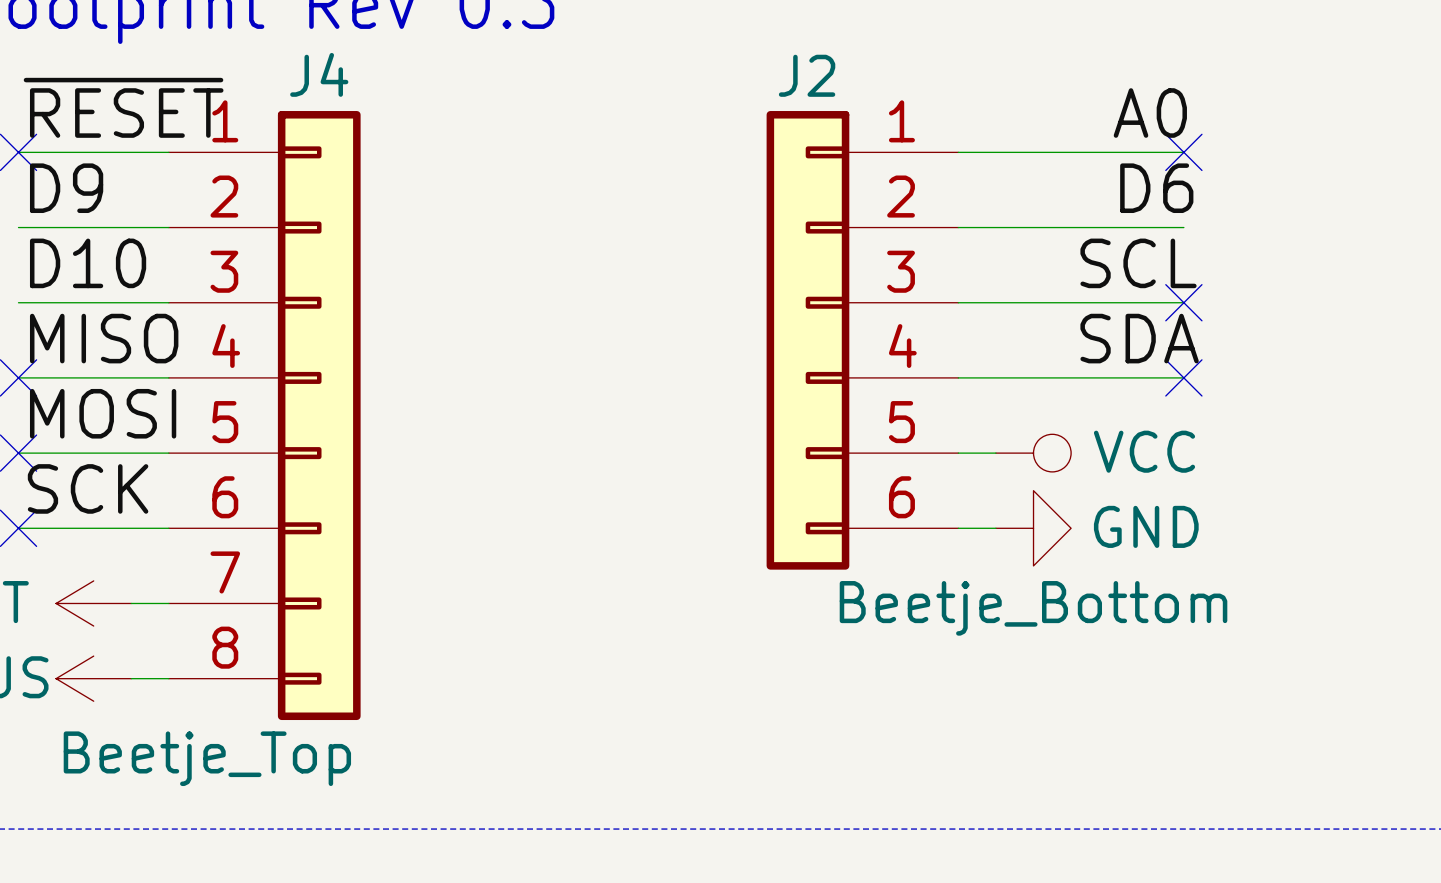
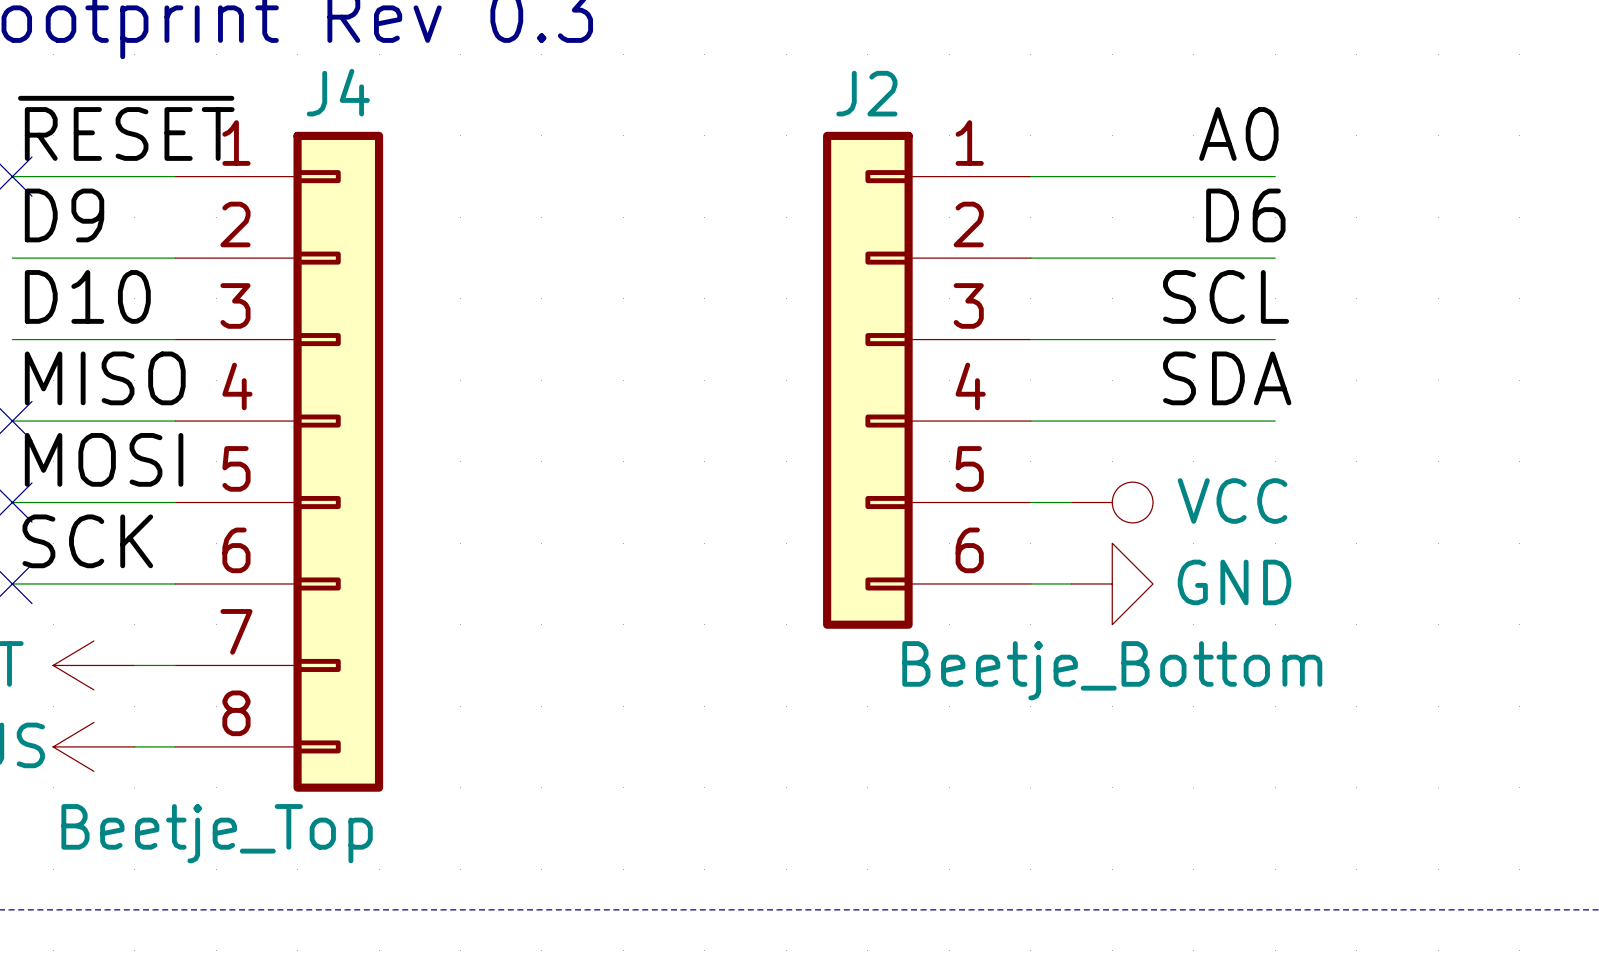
no-connect mark: (1183, 152) -> none
no-connect mark: (1183, 302) -> none
no-connect mark: (1183, 377) -> none

